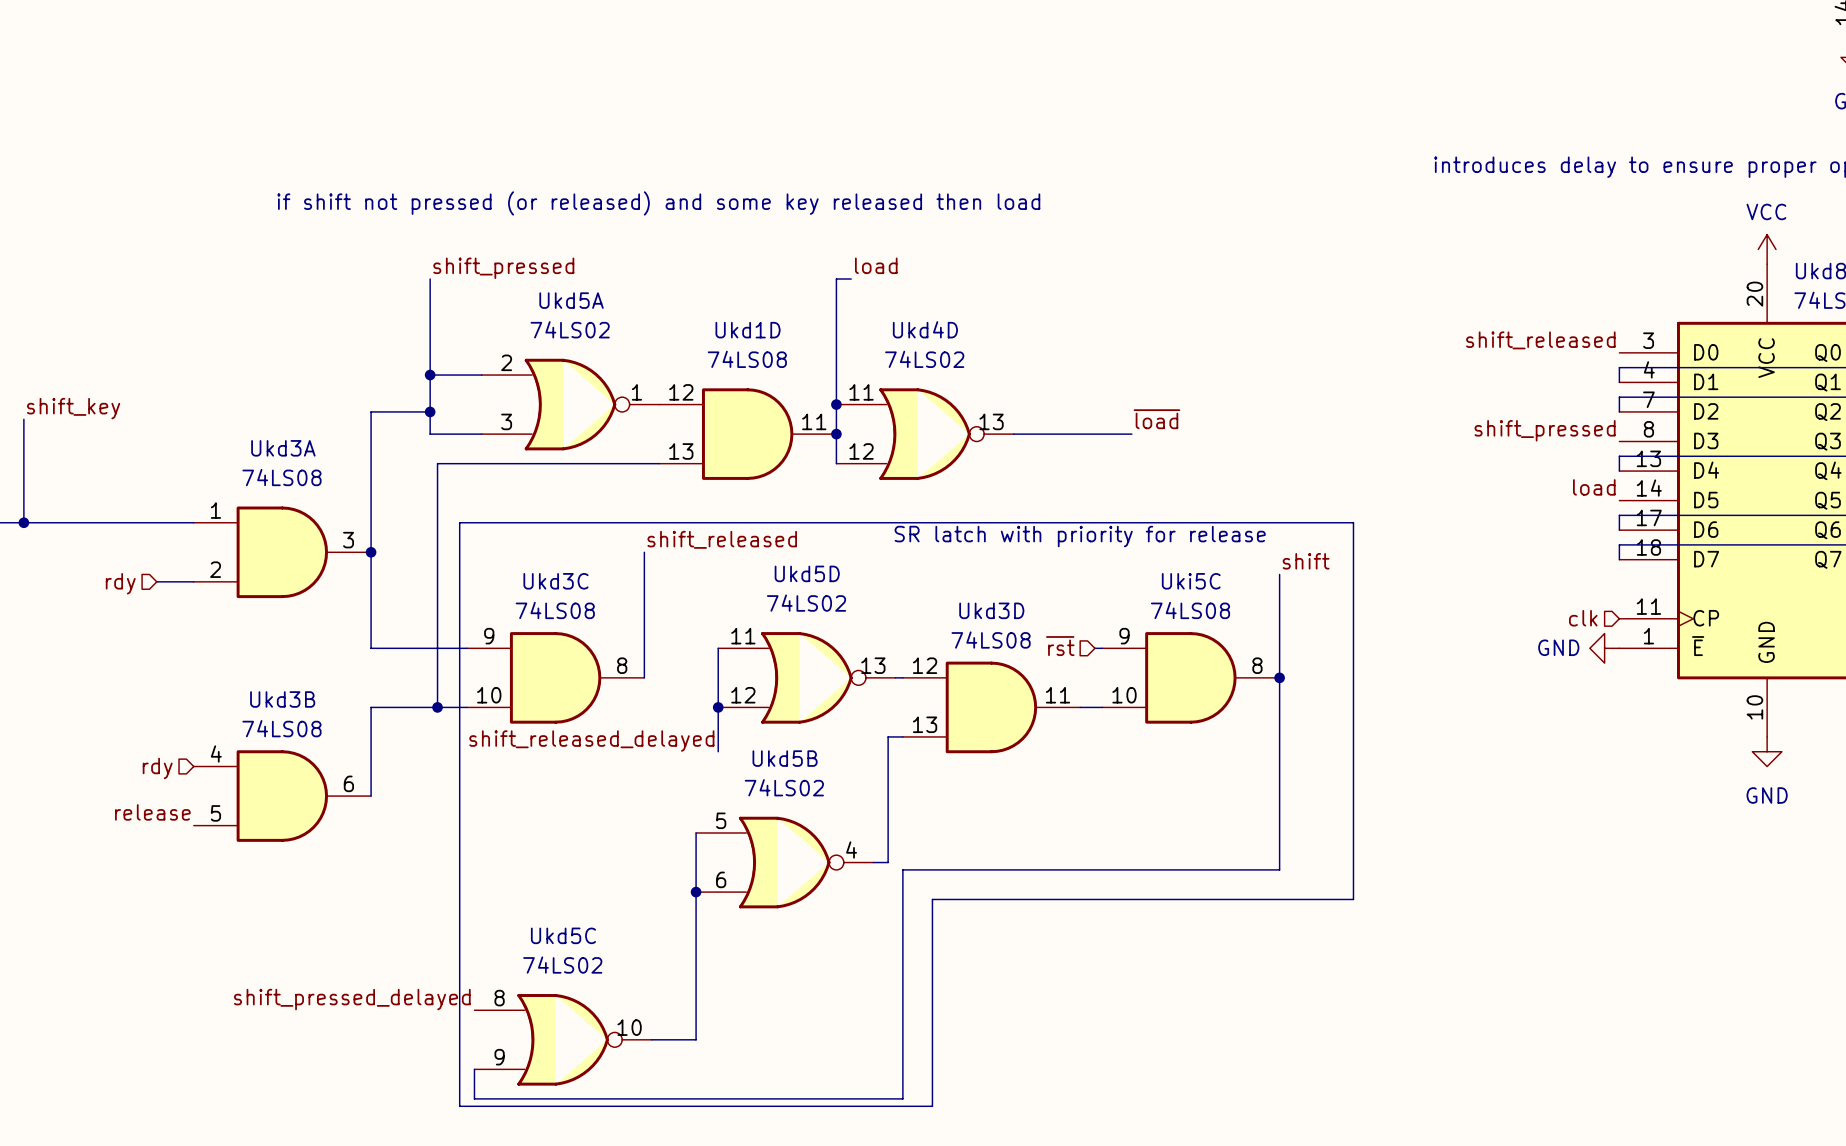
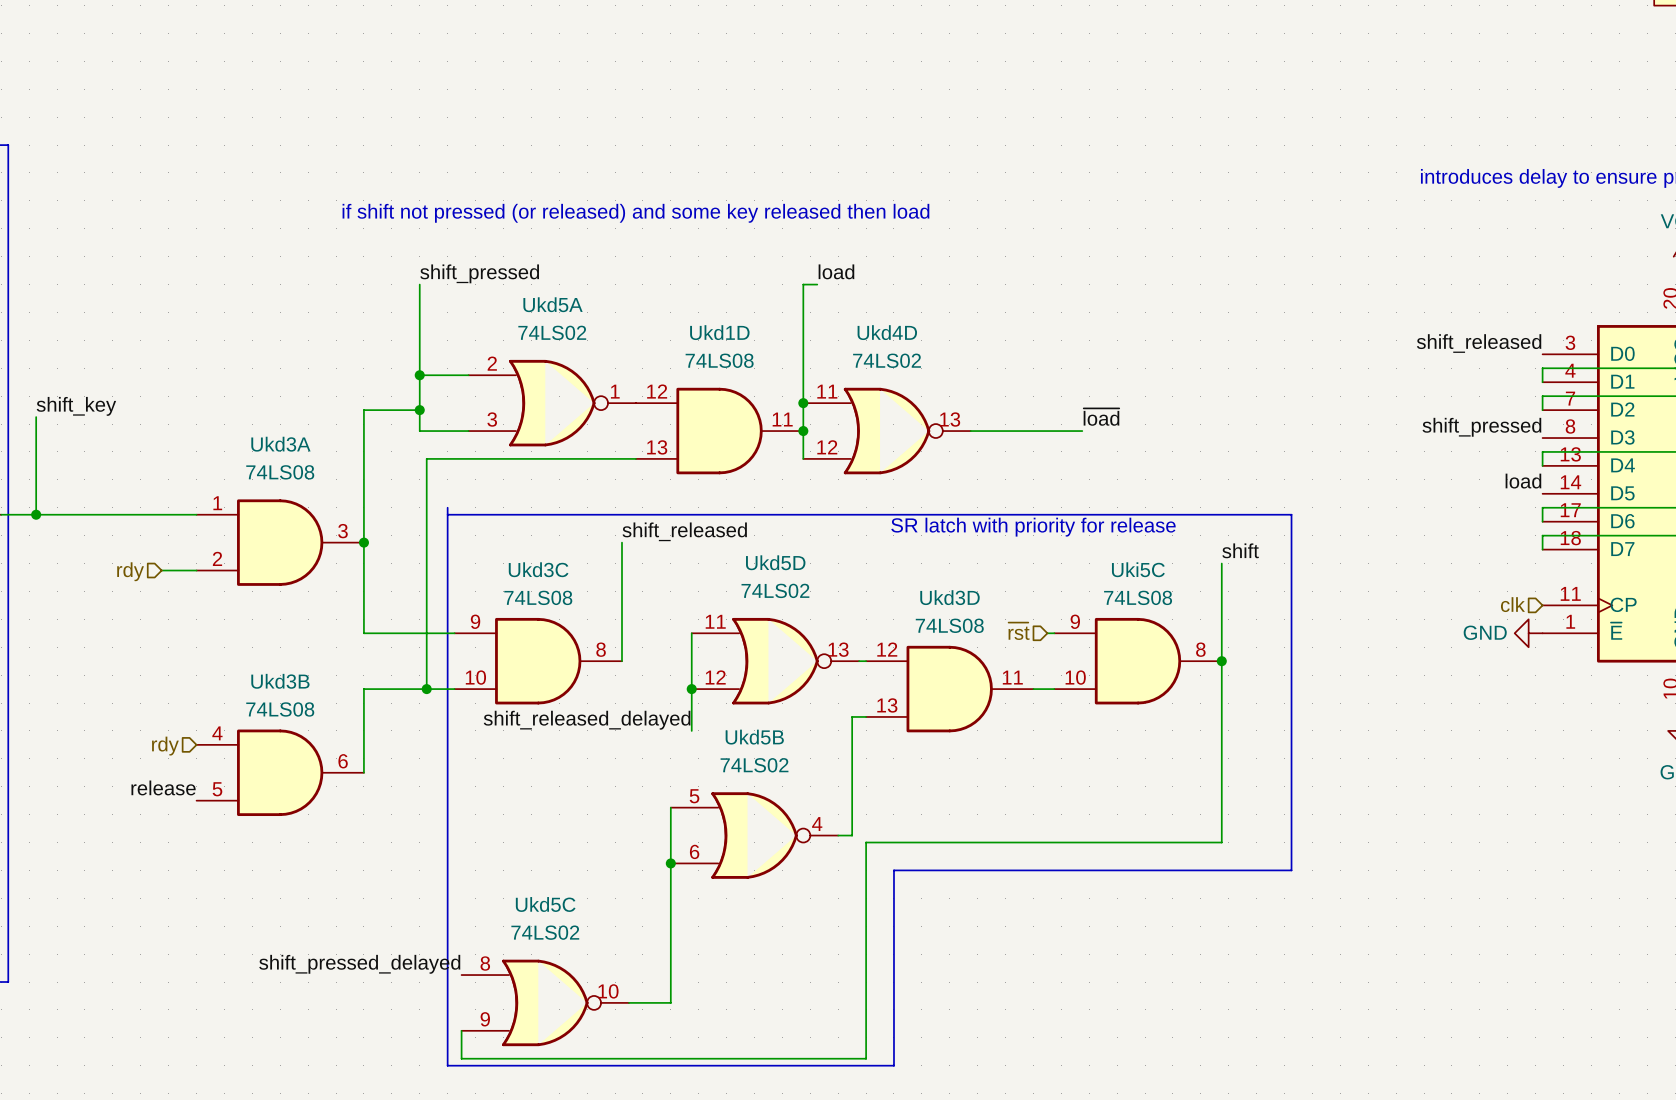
line: none -> (447, 507) (447, 514)

